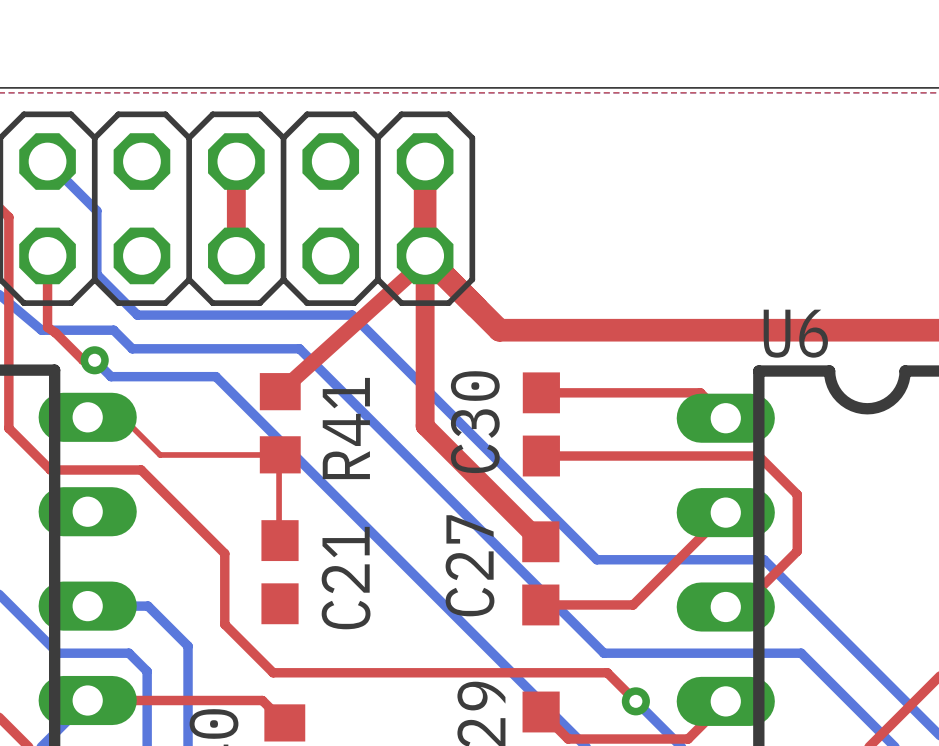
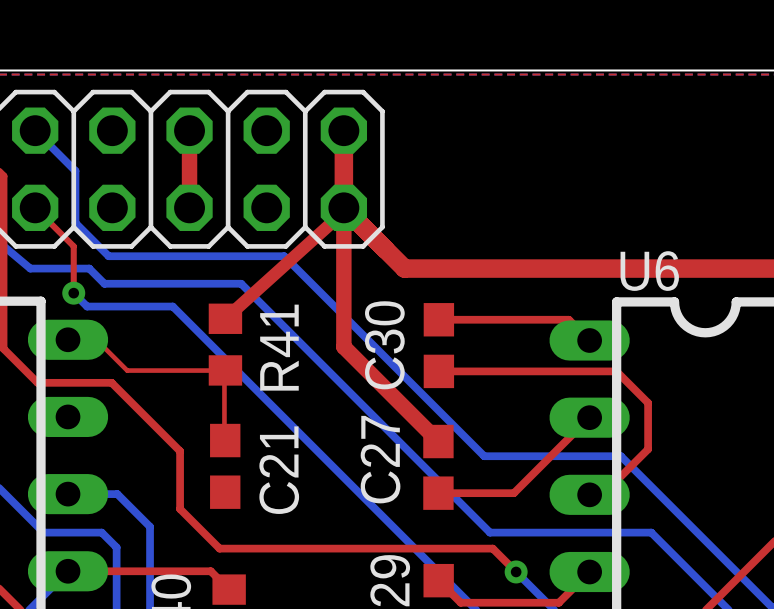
top track: (47, 255) (47, 327) (83, 360) (94, 360) -> (35, 207) (73, 246) (73, 293)

